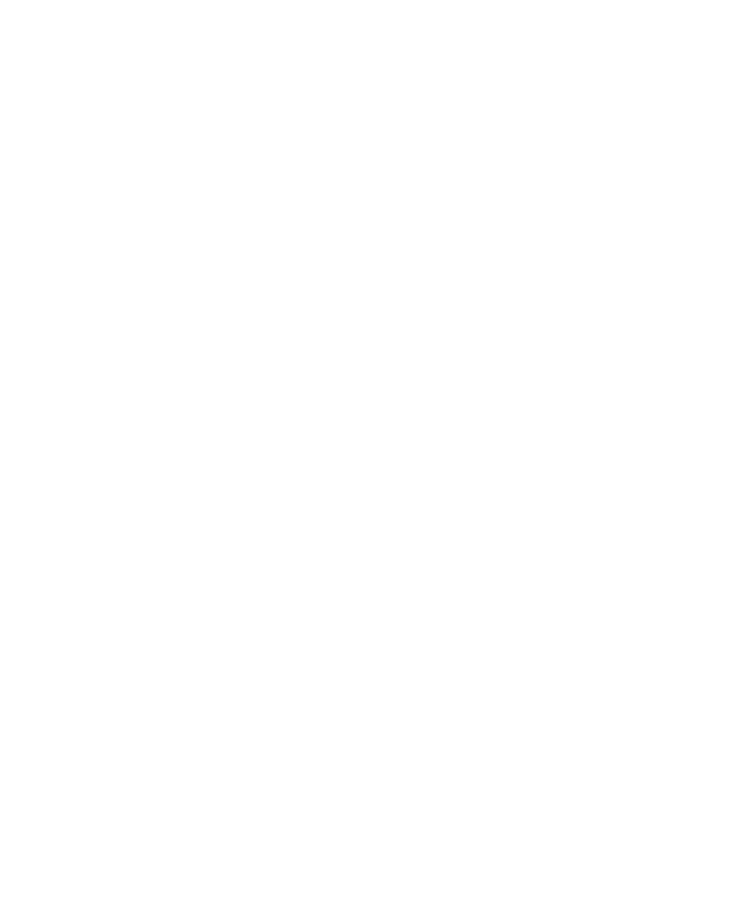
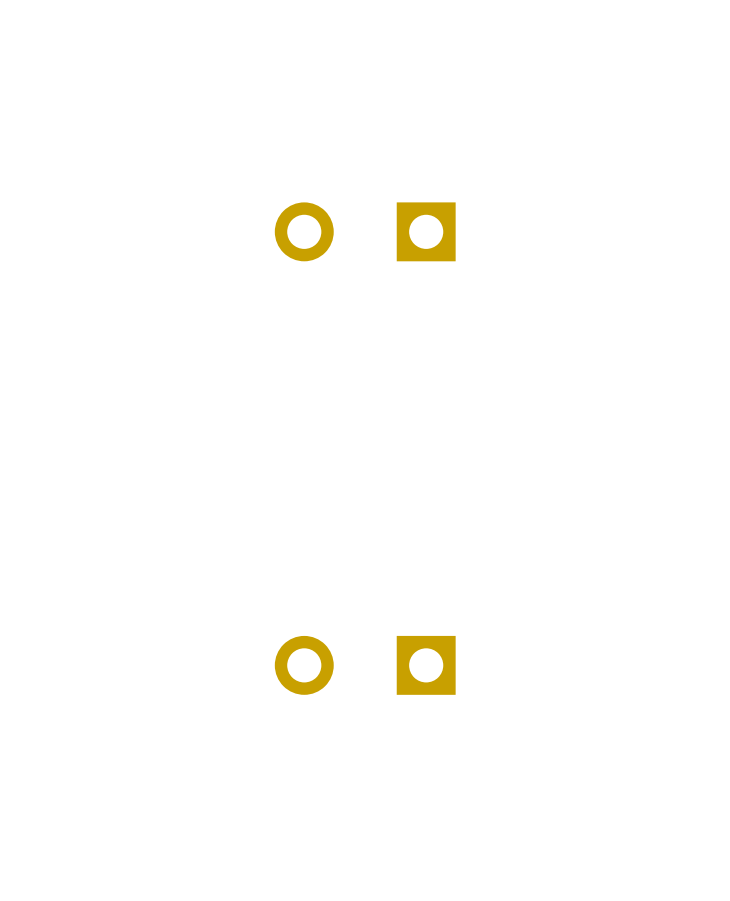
part: none -> (365, 231)
part: none -> (365, 665)

